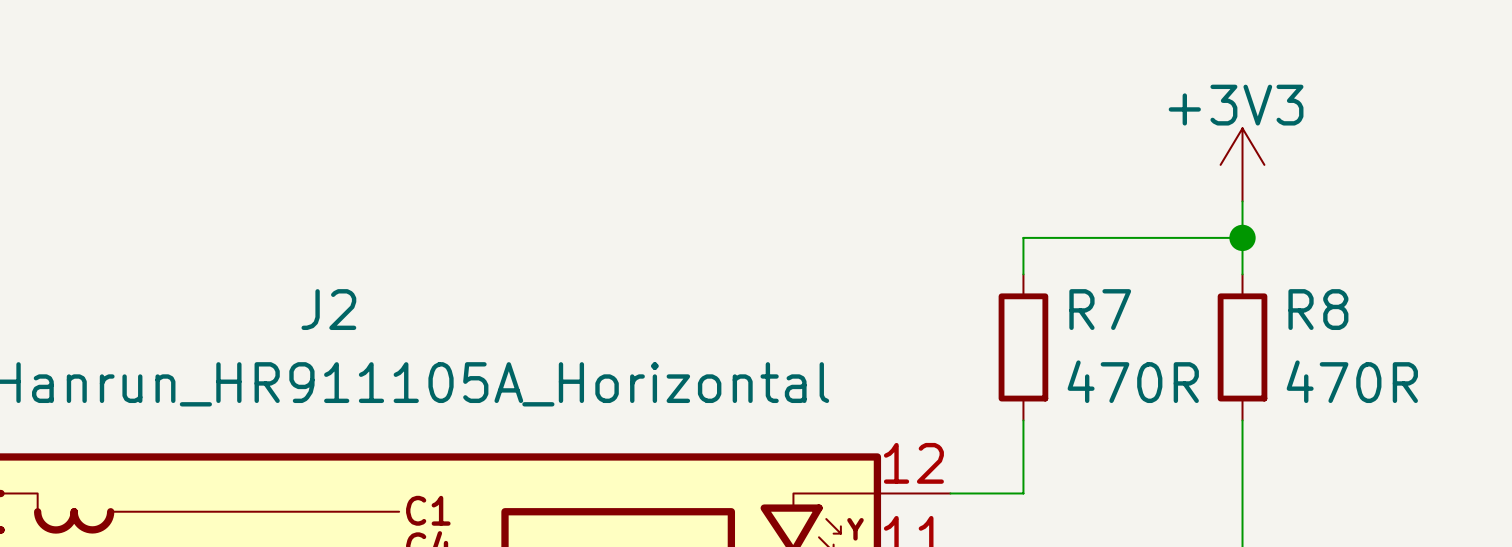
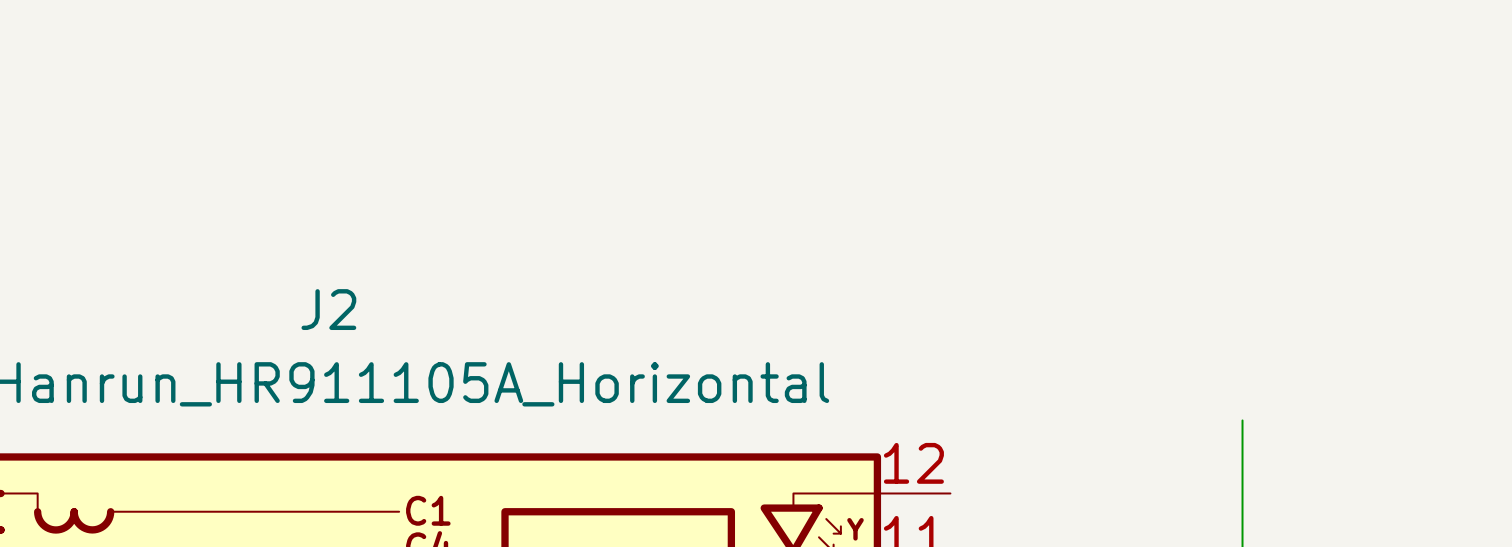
power symbol: +3V3 (1242, 164) -> none
wire: (1242, 201) (1242, 274) -> none
wire: (1242, 237) (1023, 237) (1023, 274) -> none
junction: (1242, 237) -> none
R7: 470R (1023, 347) -> none
R8: 470R (1242, 347) -> none
wire: (1023, 420) (1023, 493) (950, 493) -> none

